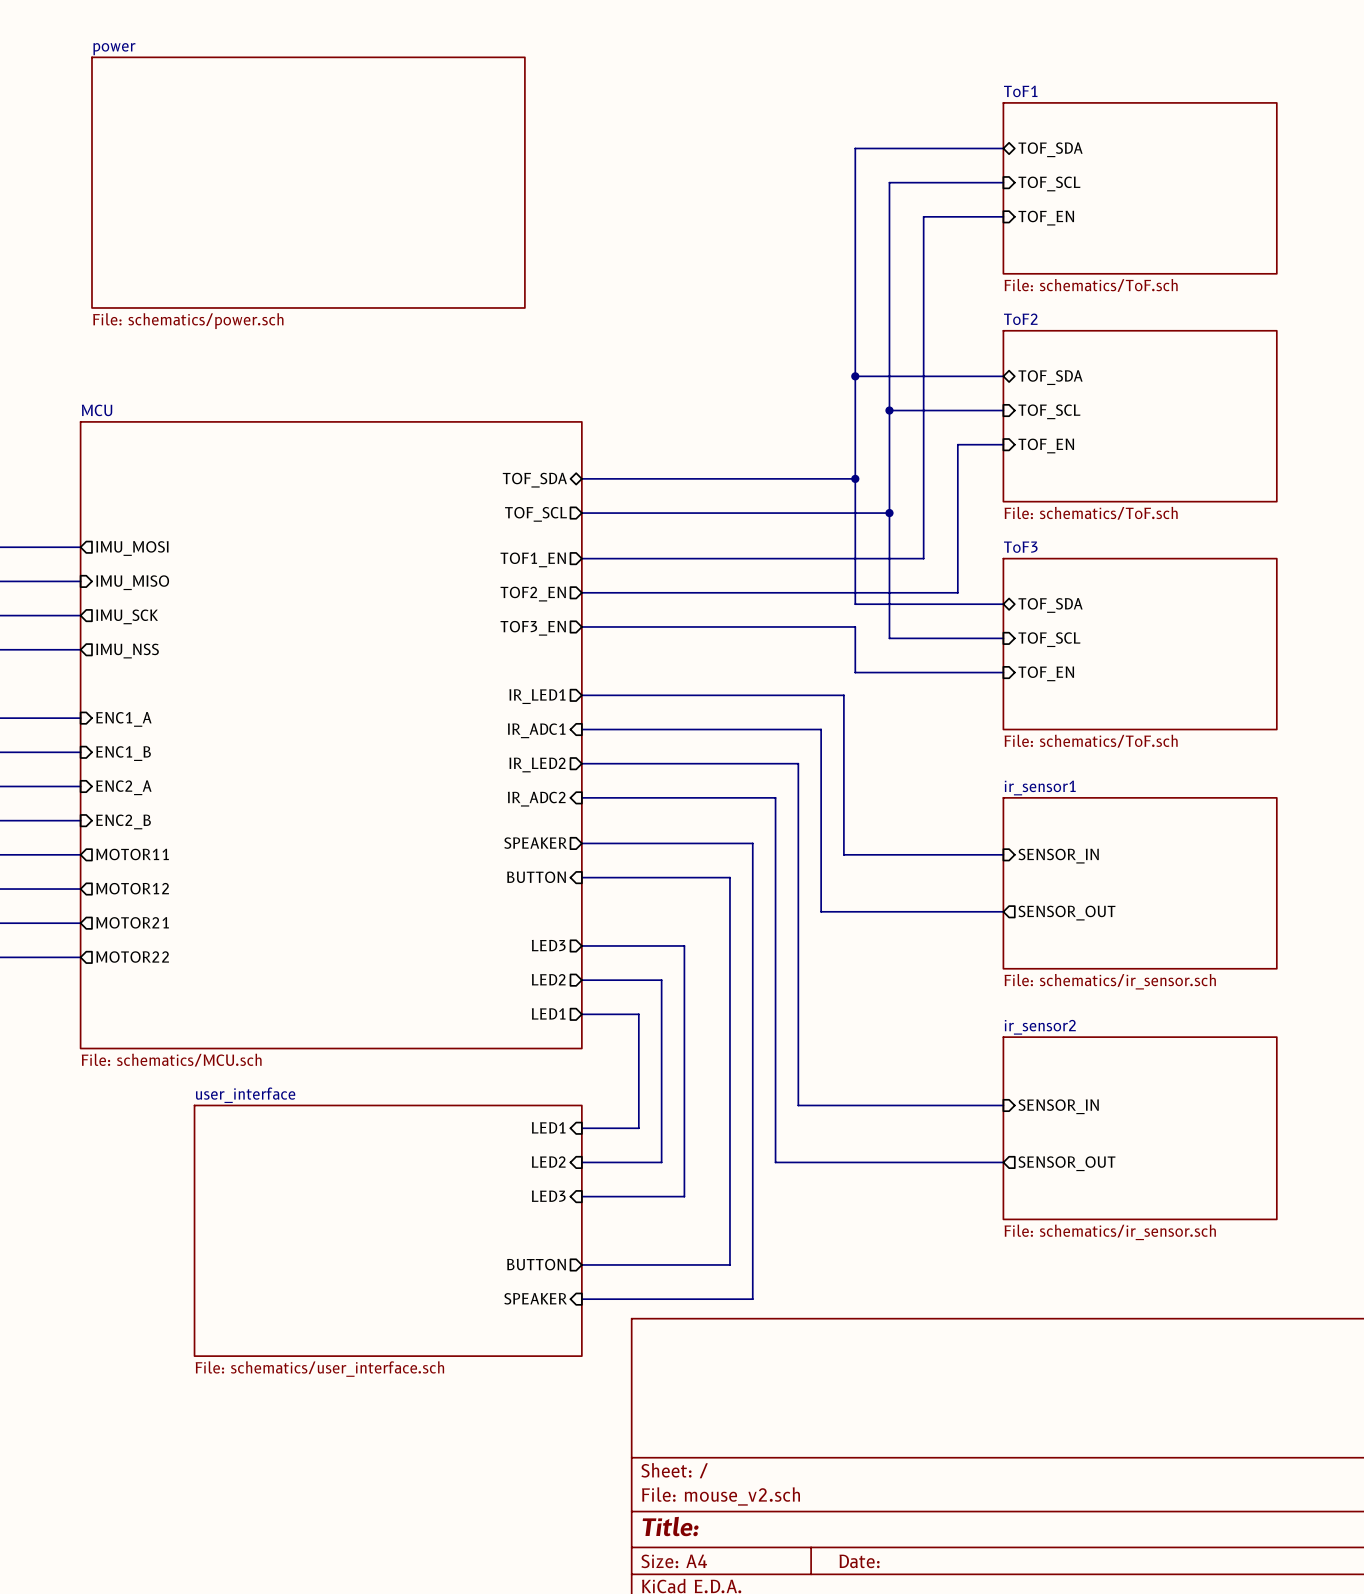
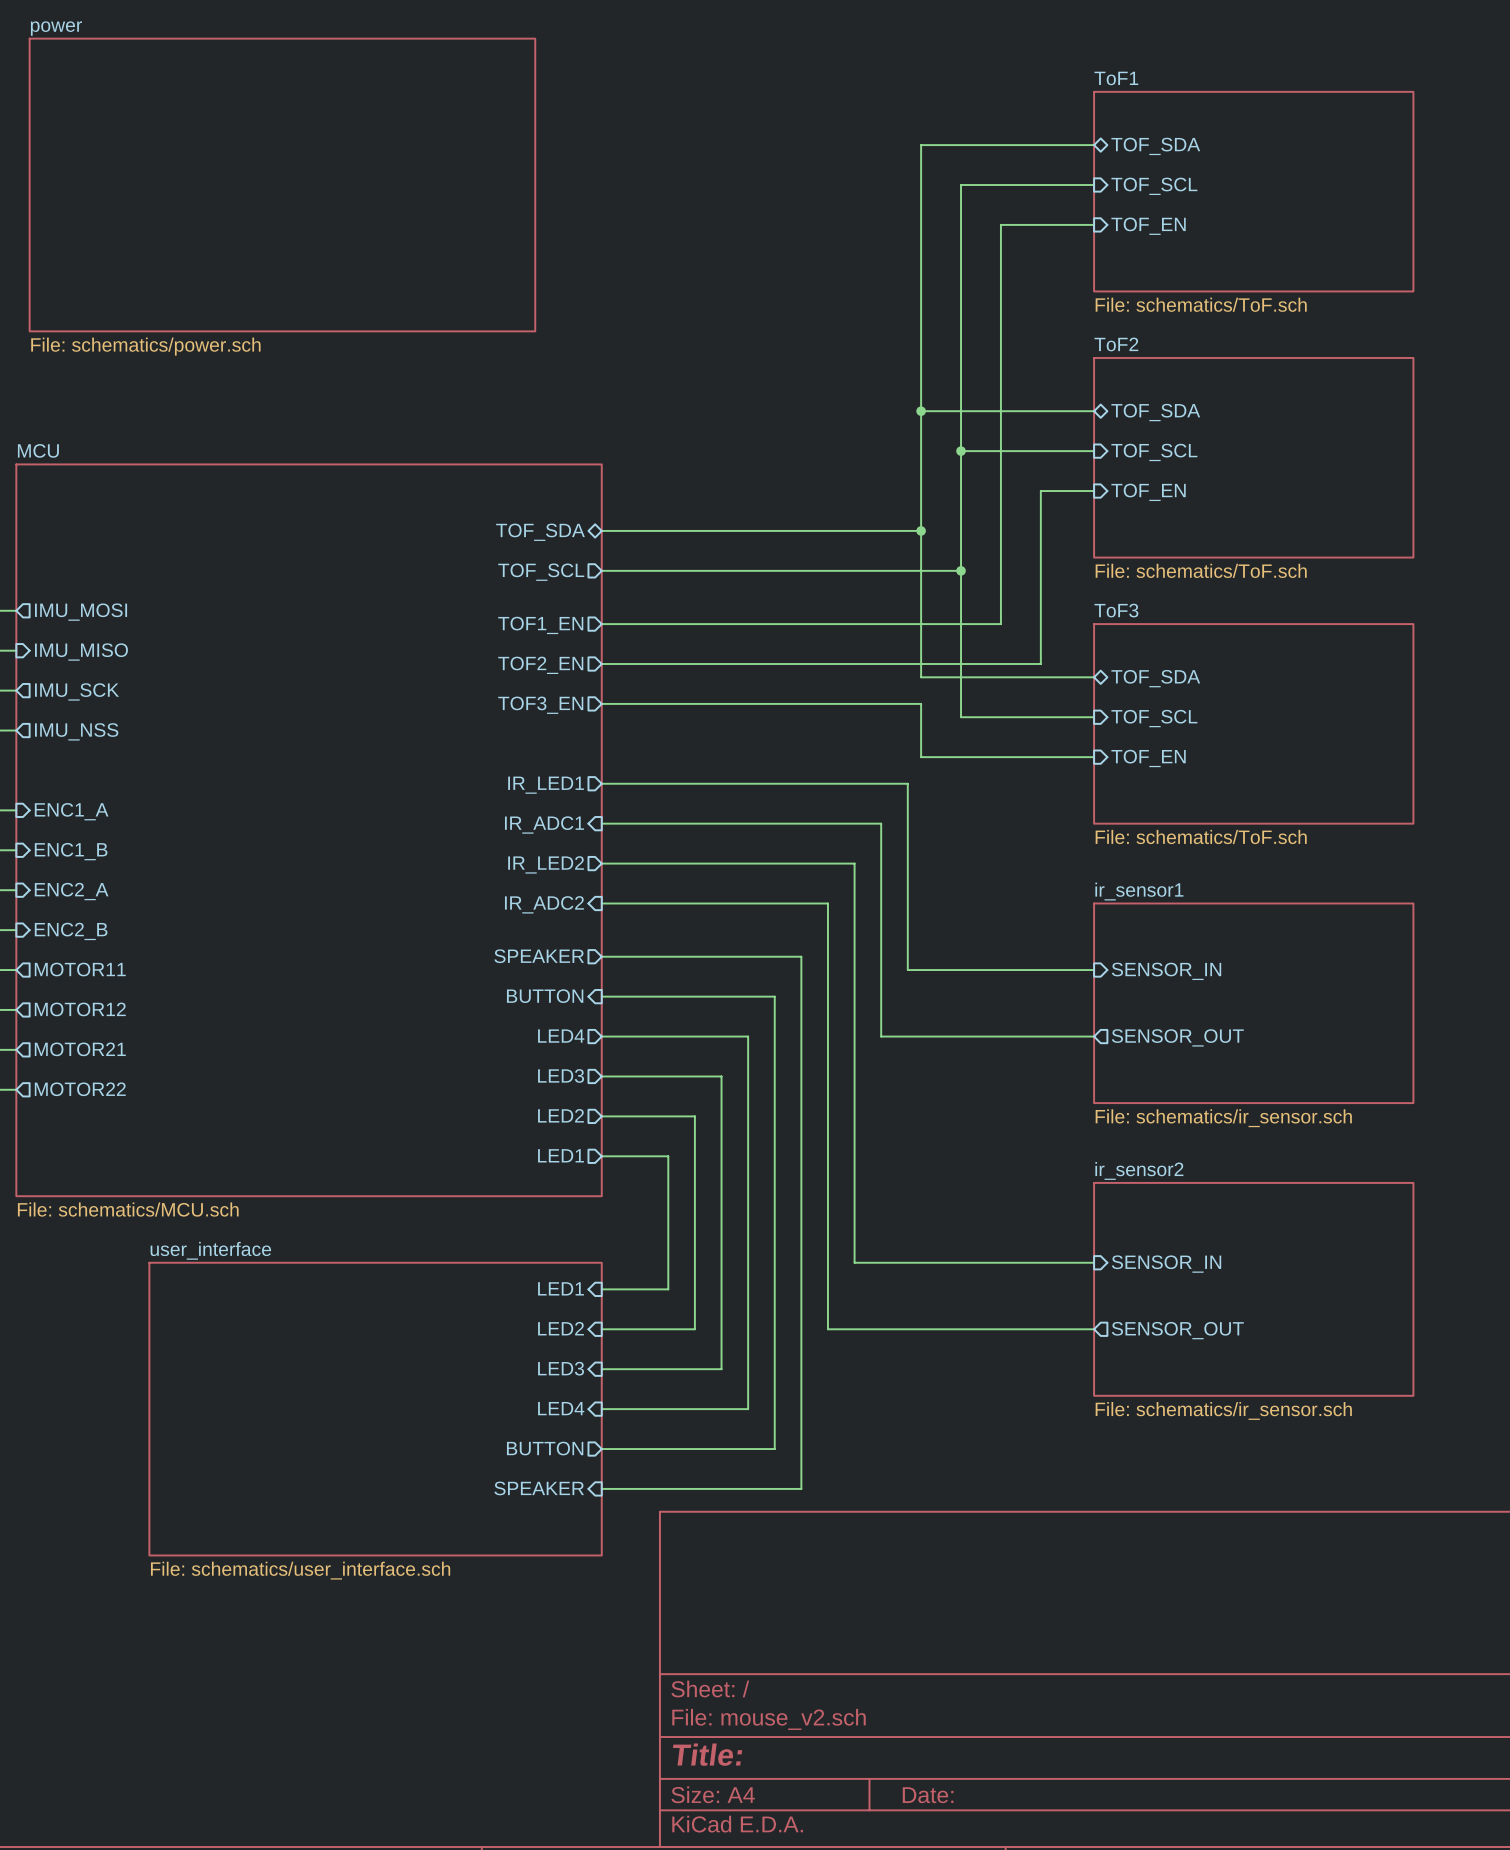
sheet pin: none -> LED4 (561, 1036)
wire: none -> (601, 1036) (748, 1036) (748, 1409) (601, 1409)
sheet pin: none -> LED4 (561, 1408)

